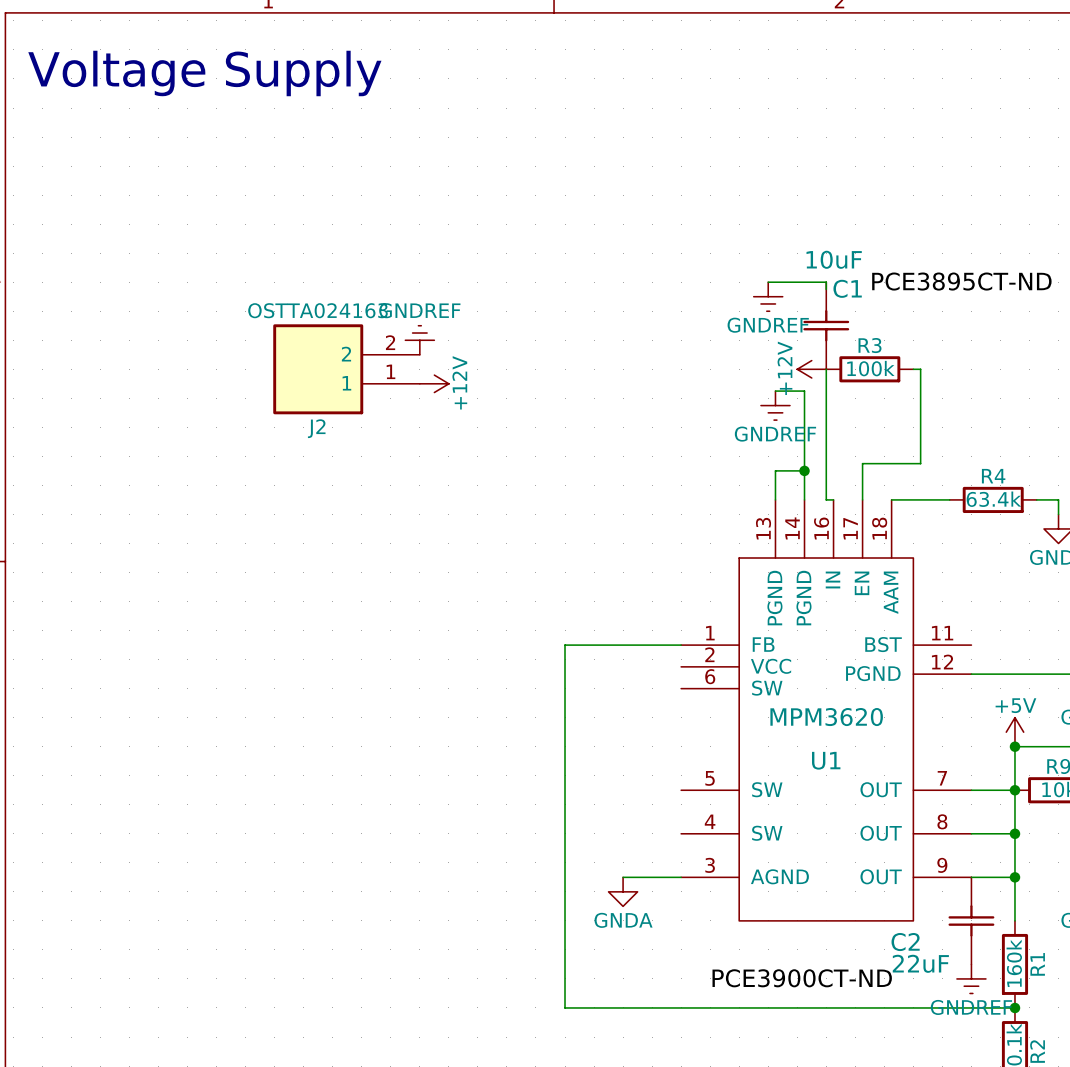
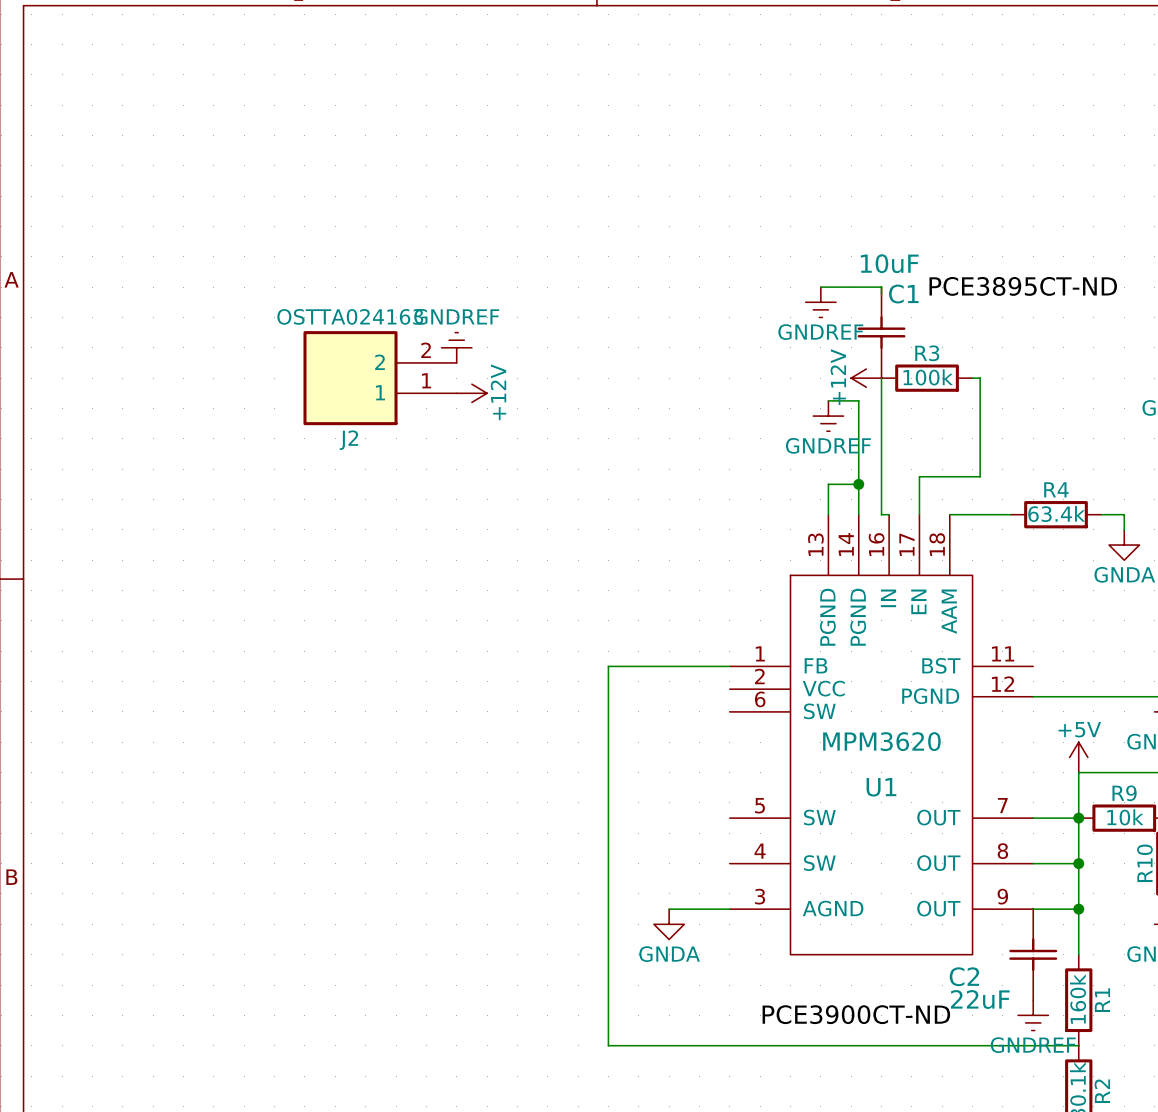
text: Voltage Supply (204, 73) -> none
junction: (1014, 746) -> none
junction: (1014, 1007) -> none

